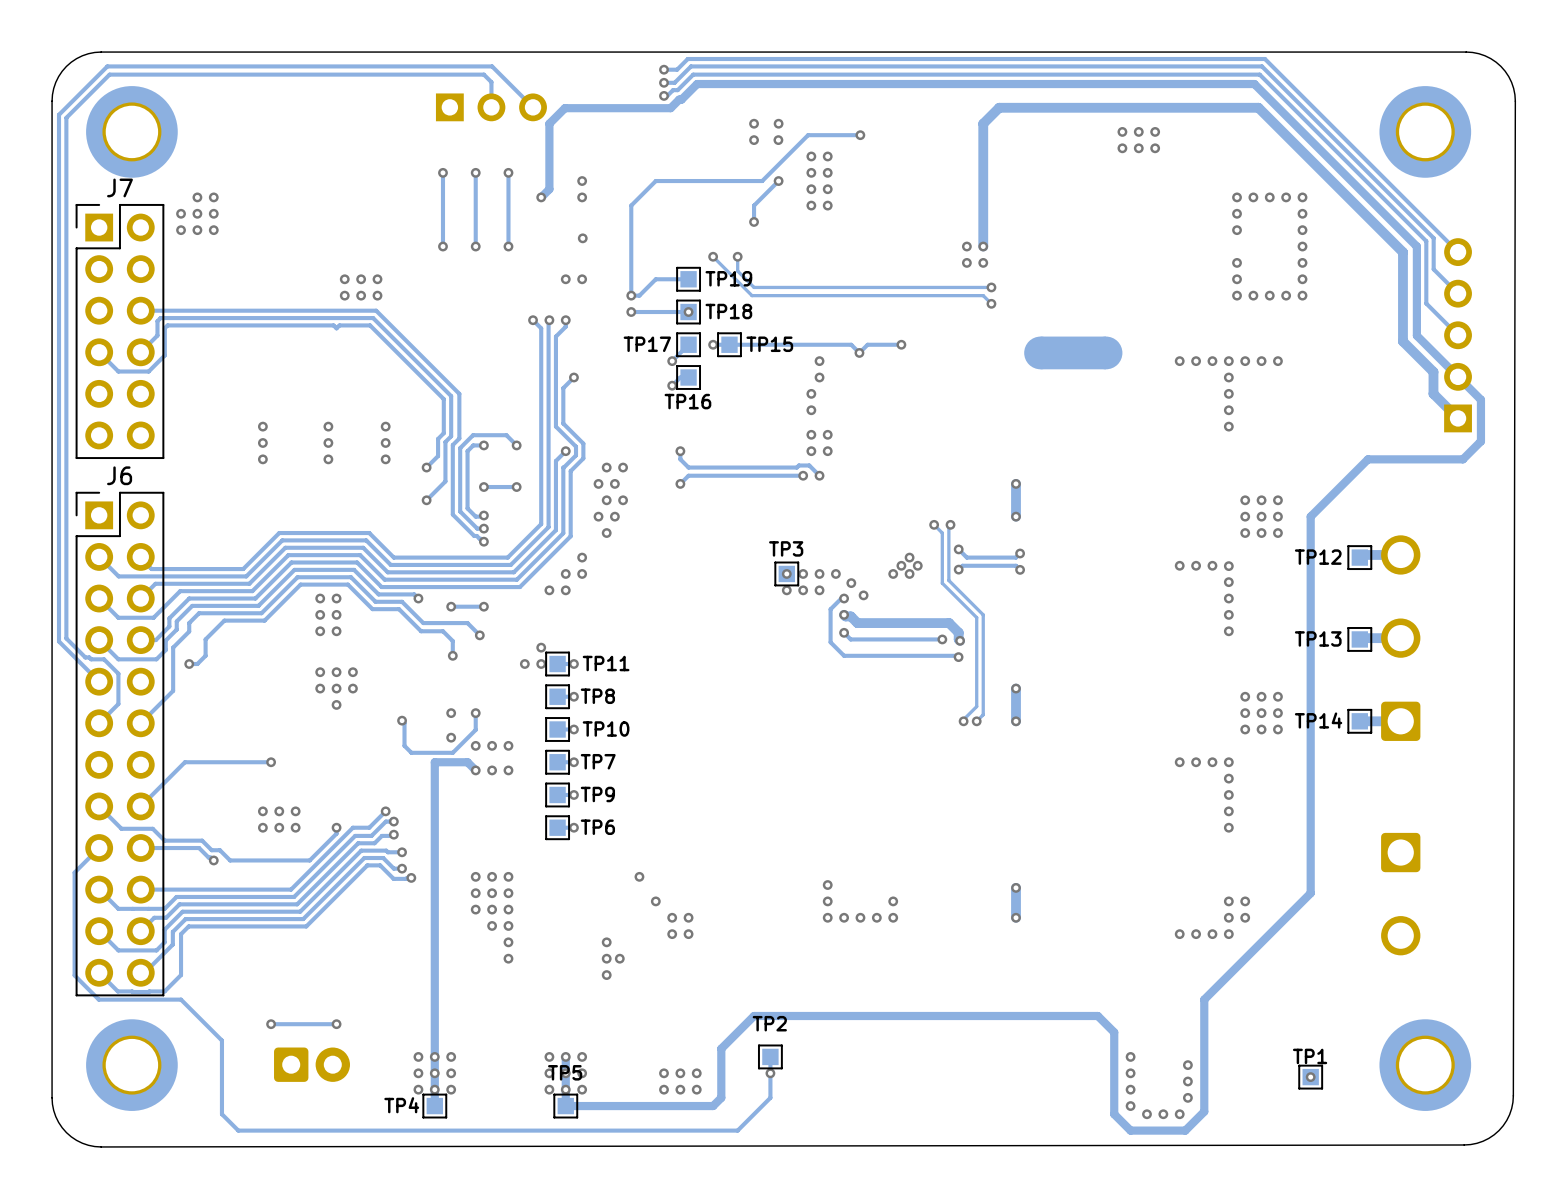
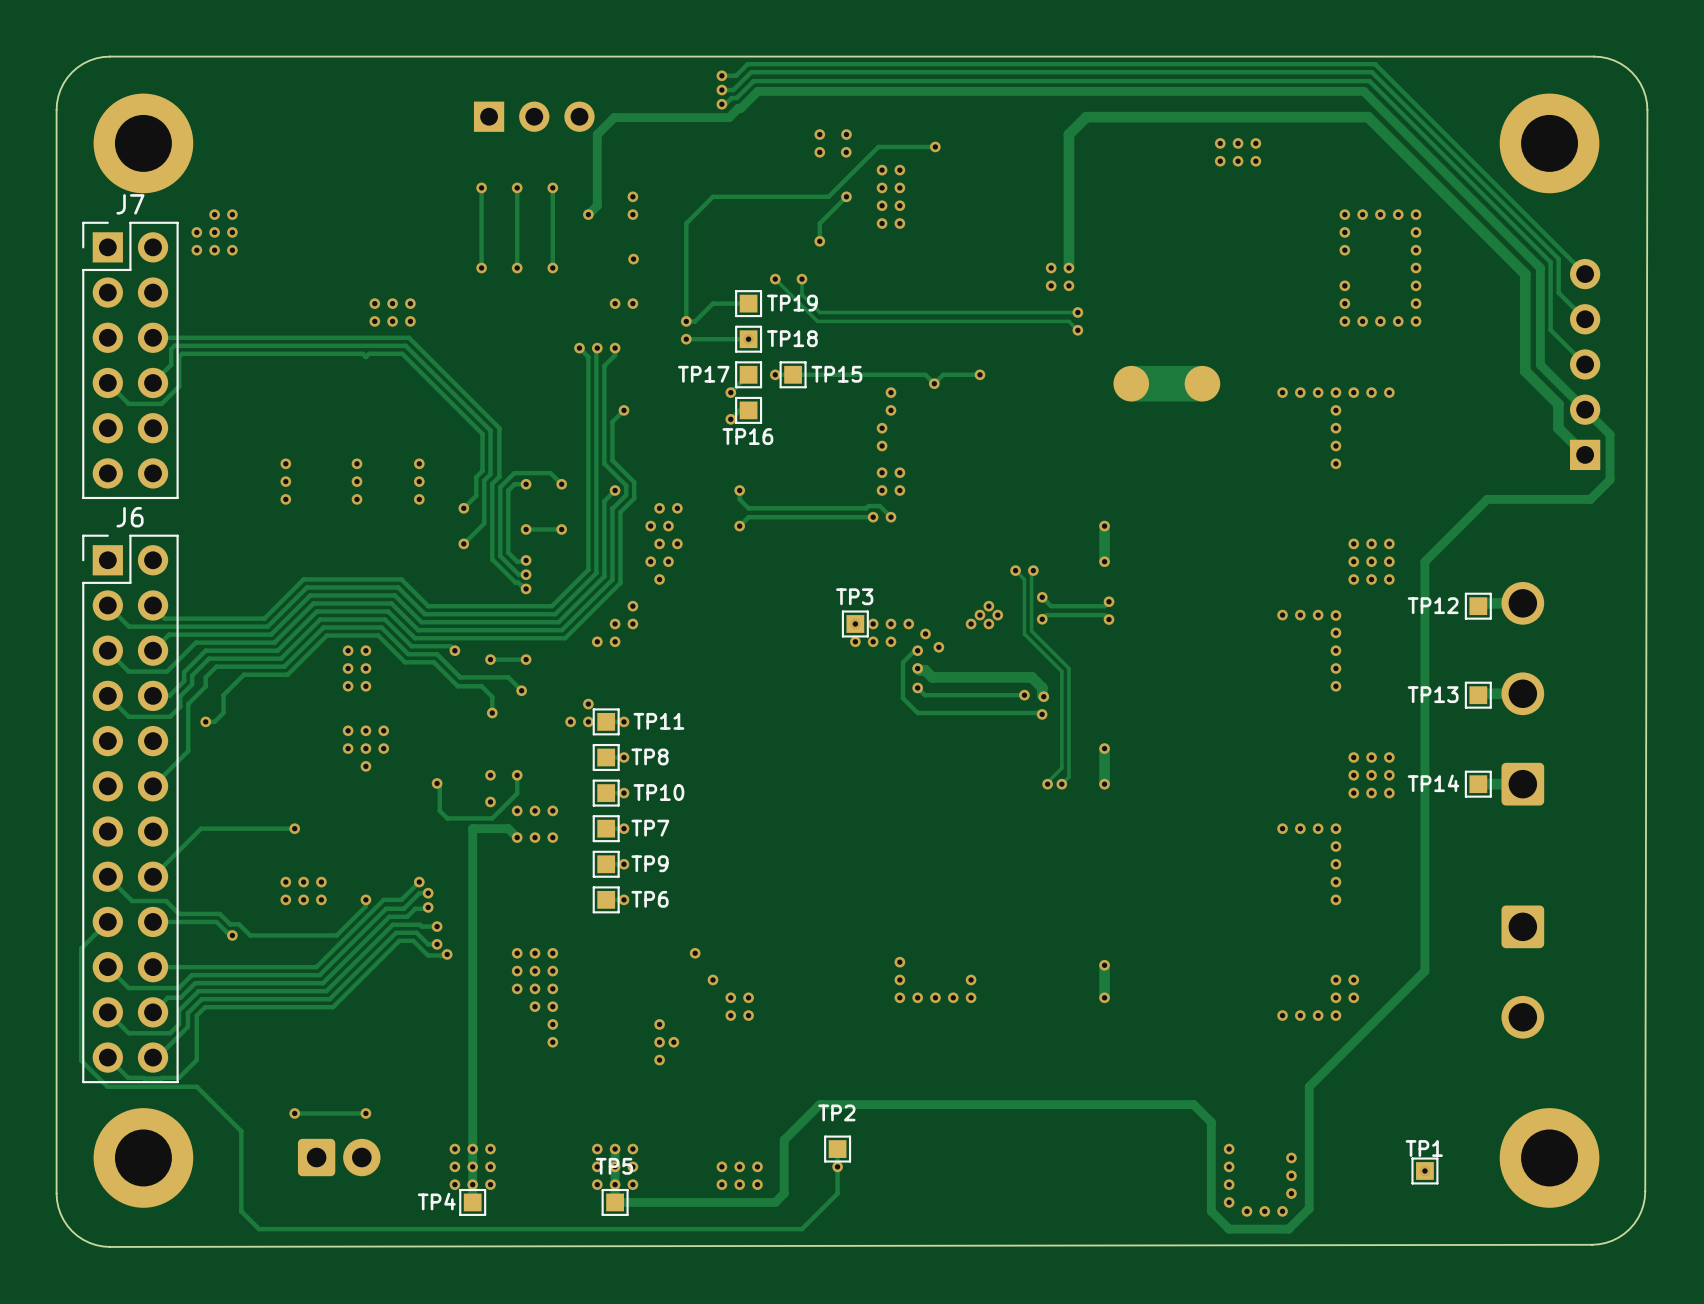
track: (491, 107) (491, 82) (483, 74) (109, 74) (66, 117) (66, 638) (85, 657) (104, 659) (118, 673) (118, 704) (99, 723) -> none
track: (533, 107) (492, 66) (107, 66) (59, 114) (59, 641) (99, 681) -> none

